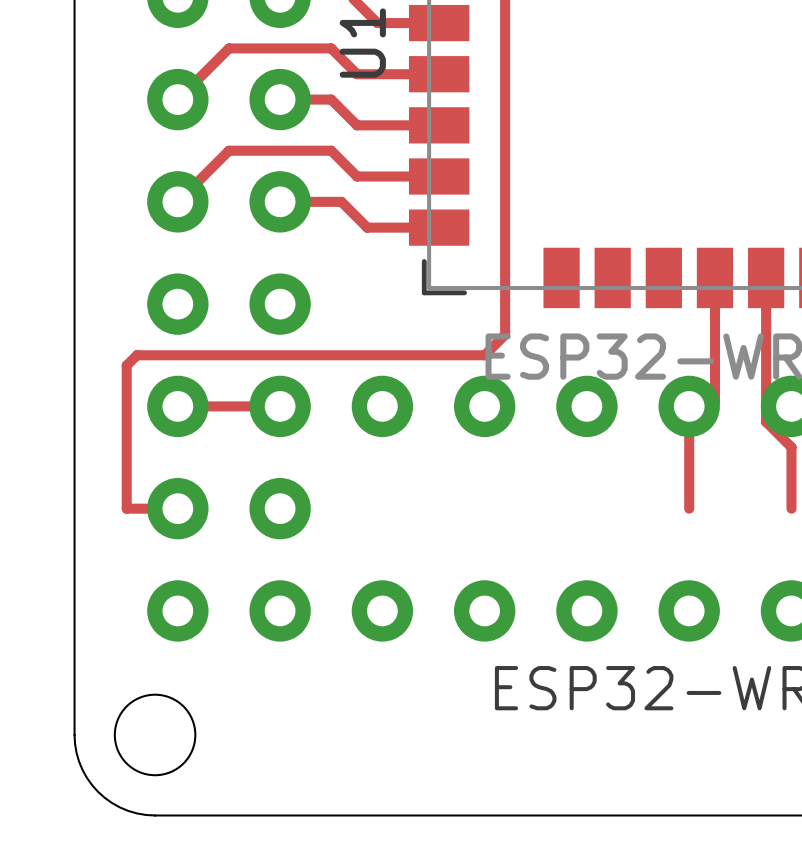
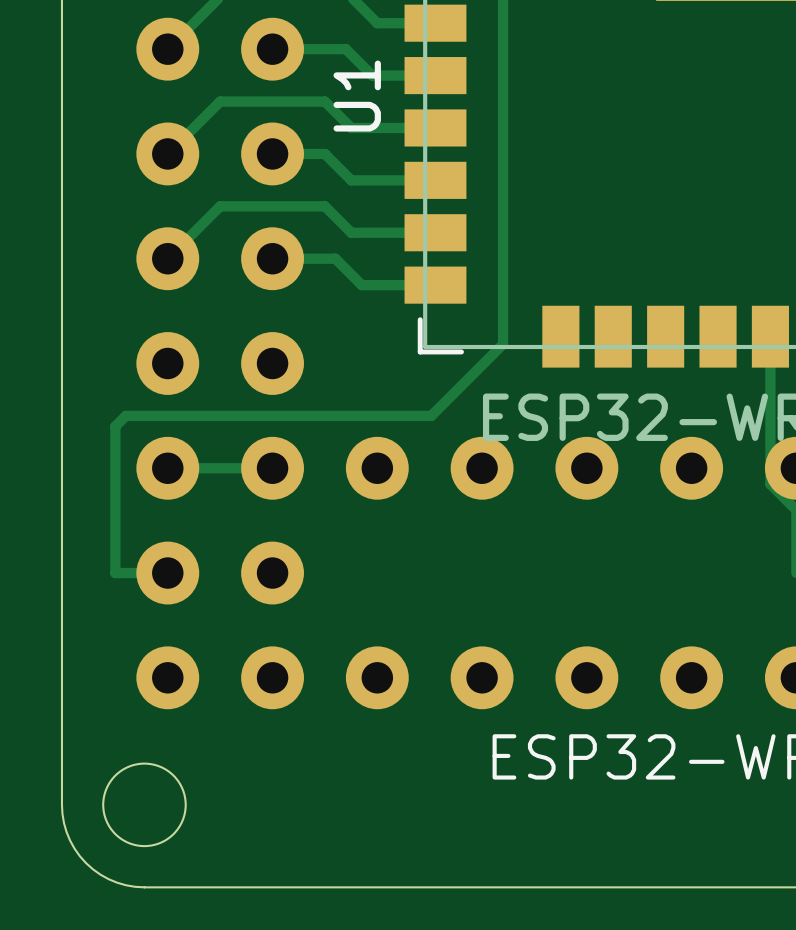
track: (714, 277) (714, 401) (689, 426) (689, 508) -> none
track: (505, 285) (505, 334) (484, 355) (435, 355) -> (503, 344) (431, 415)

